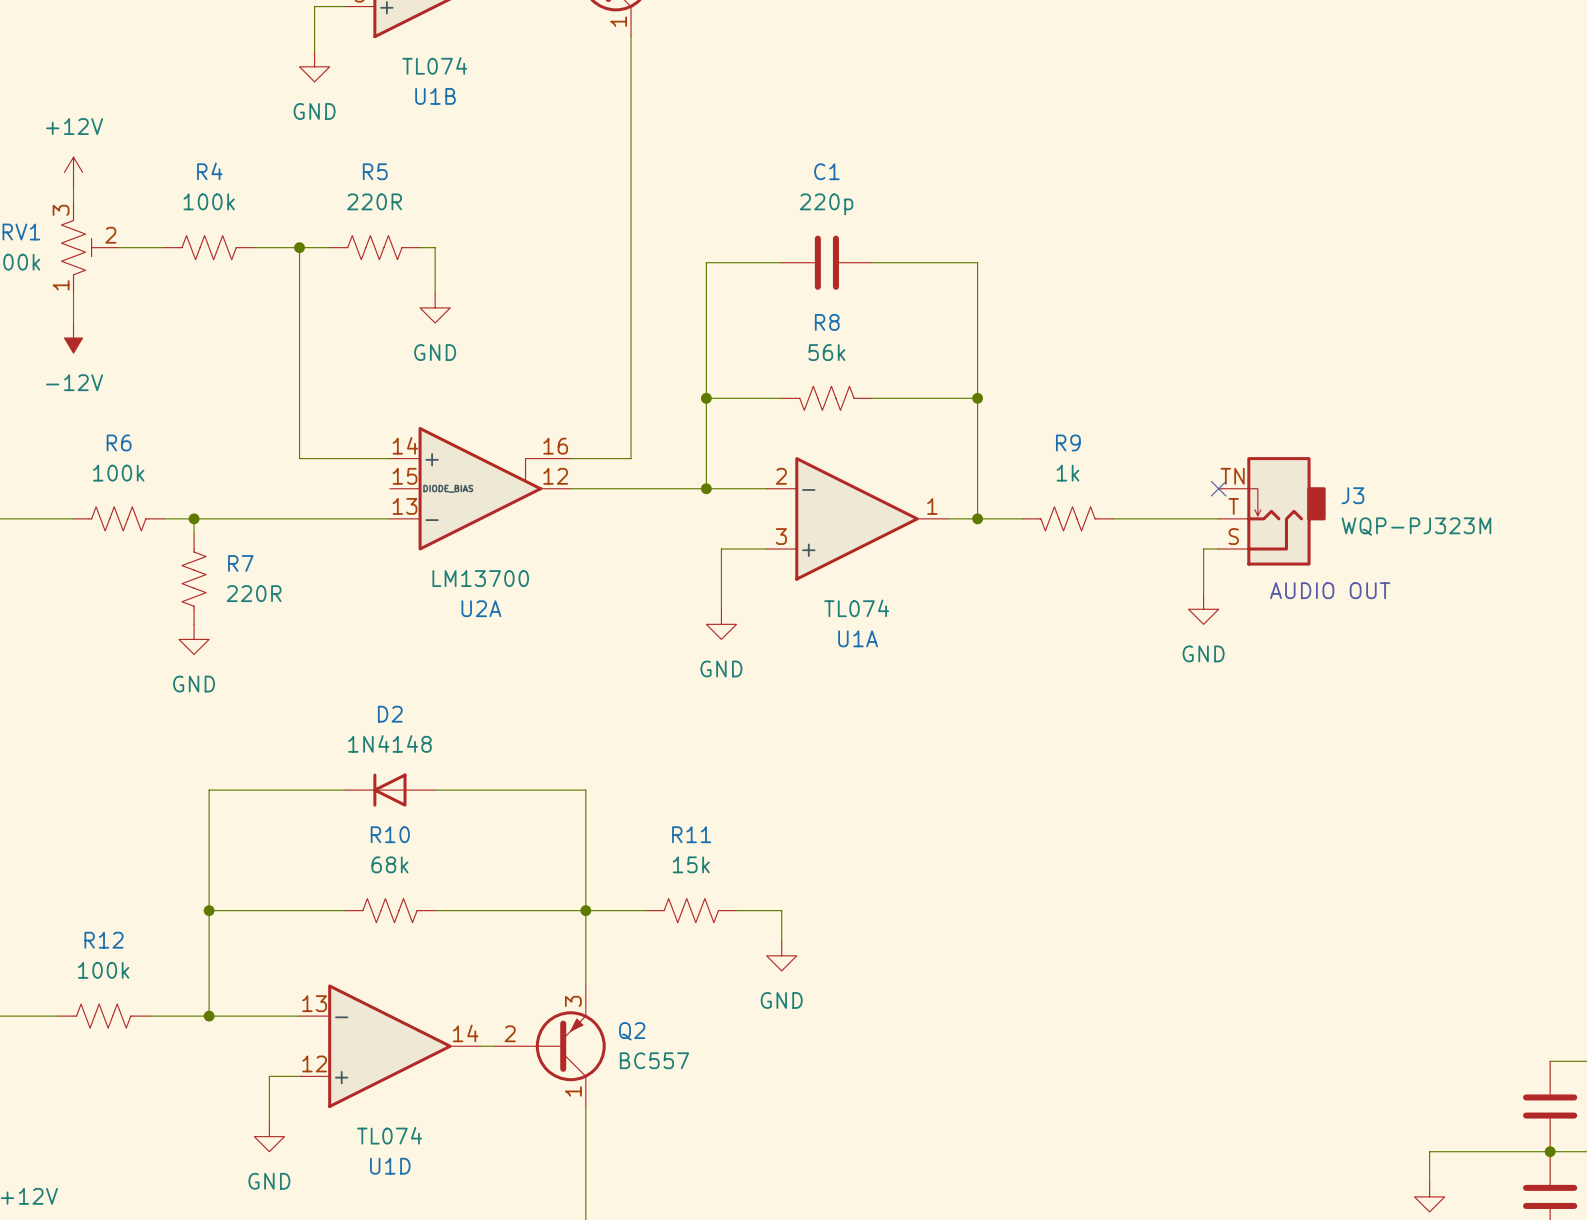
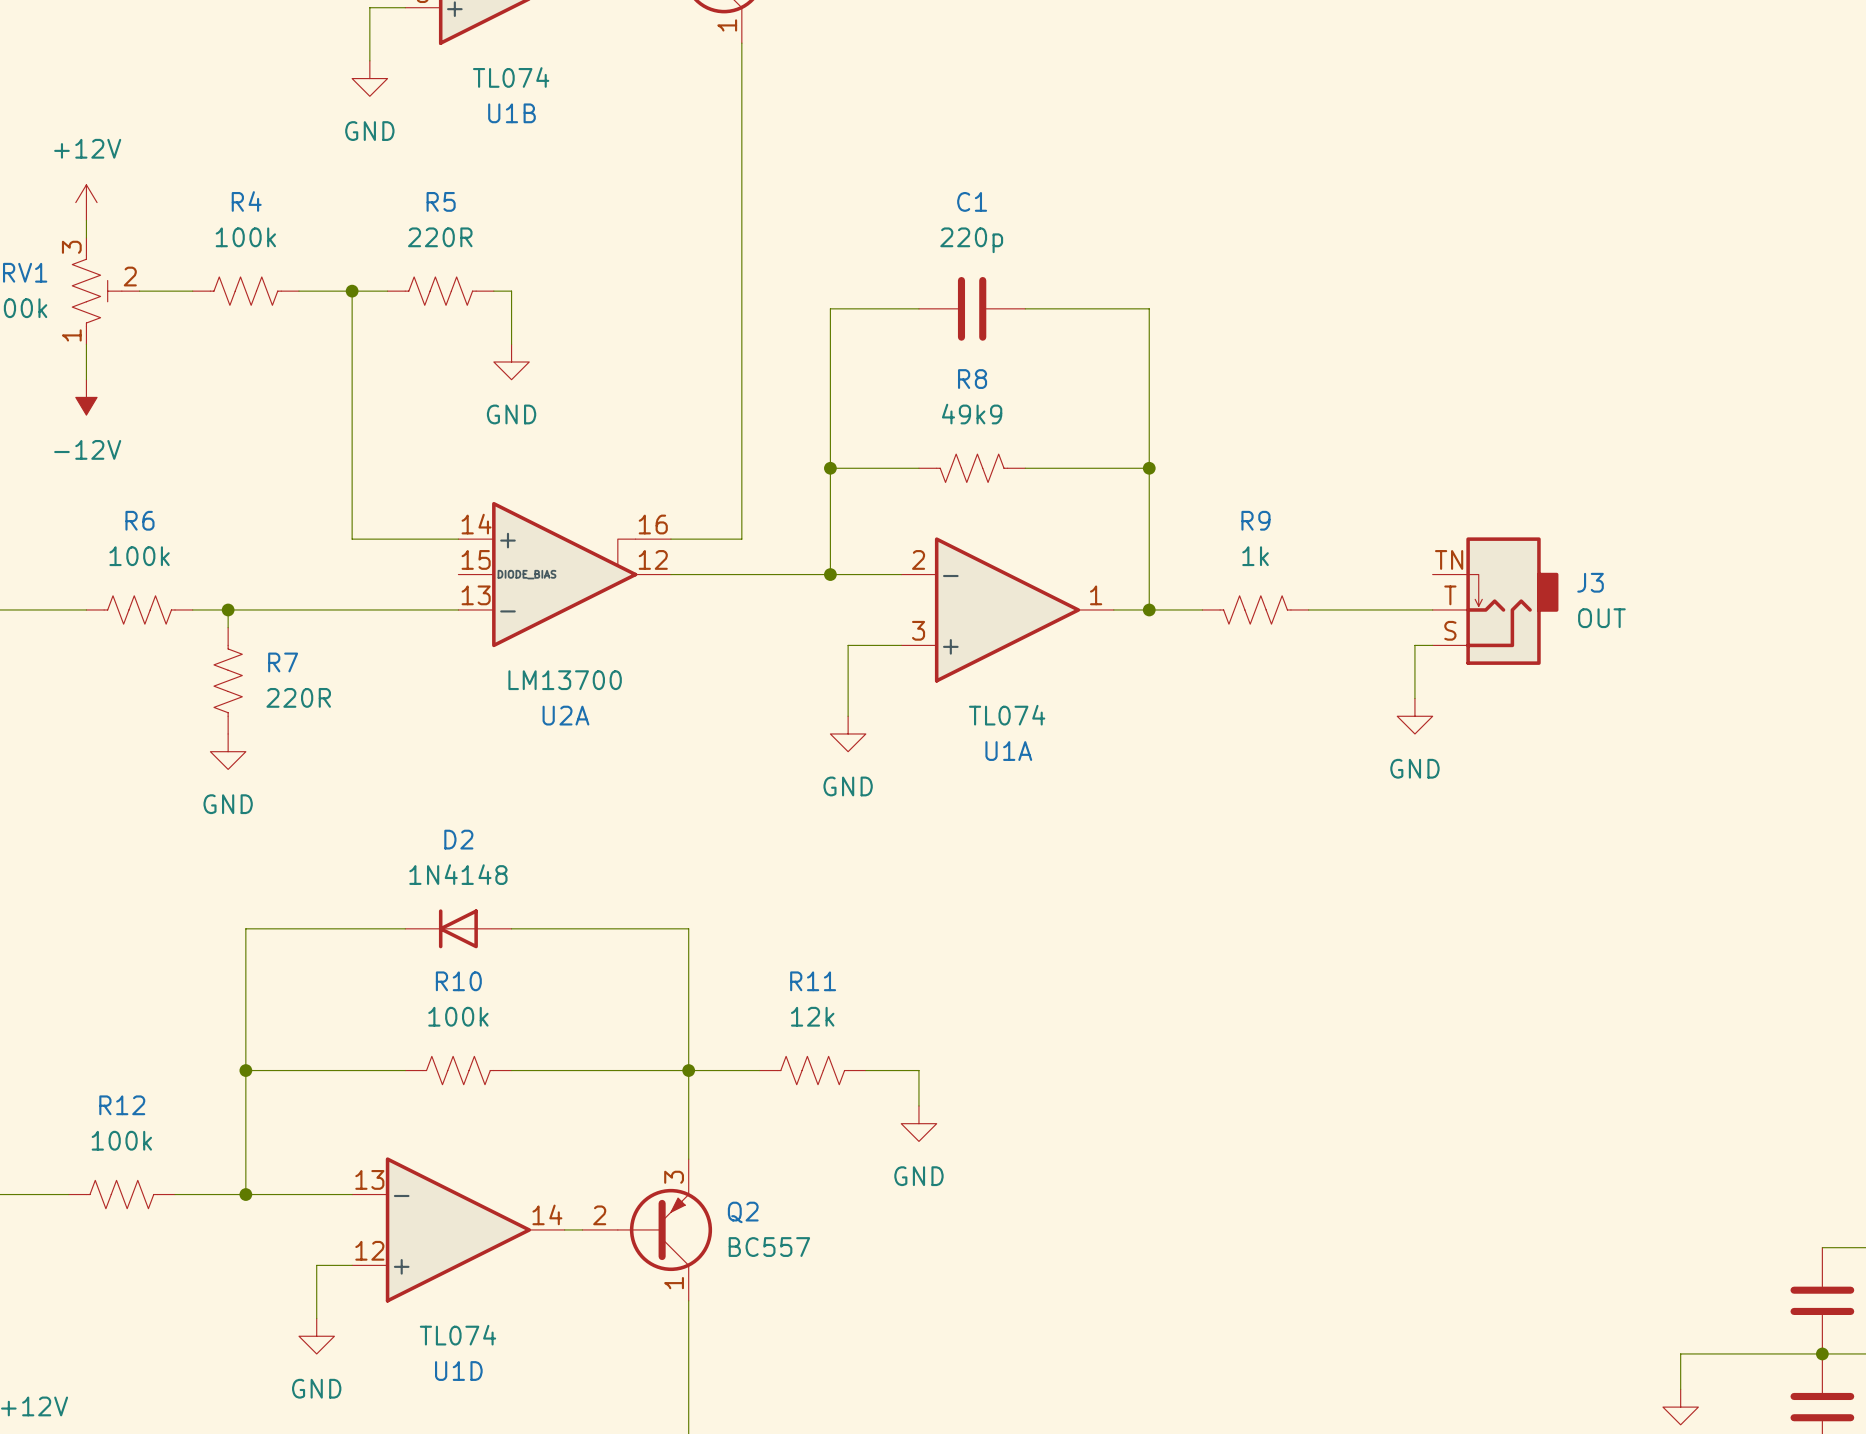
R8 value: 56k (826, 352) -> 49k9 (972, 414)
no-connect mark: (1218, 488) -> none
J3 value: WQP-PJ323M (1416, 526) -> OUT (1601, 618)
text: AUDIO OUT (1330, 590) -> none
R10 value: 68k (389, 864) -> 100k (458, 1016)
R11 value: 15k (691, 864) -> 12k (812, 1016)

